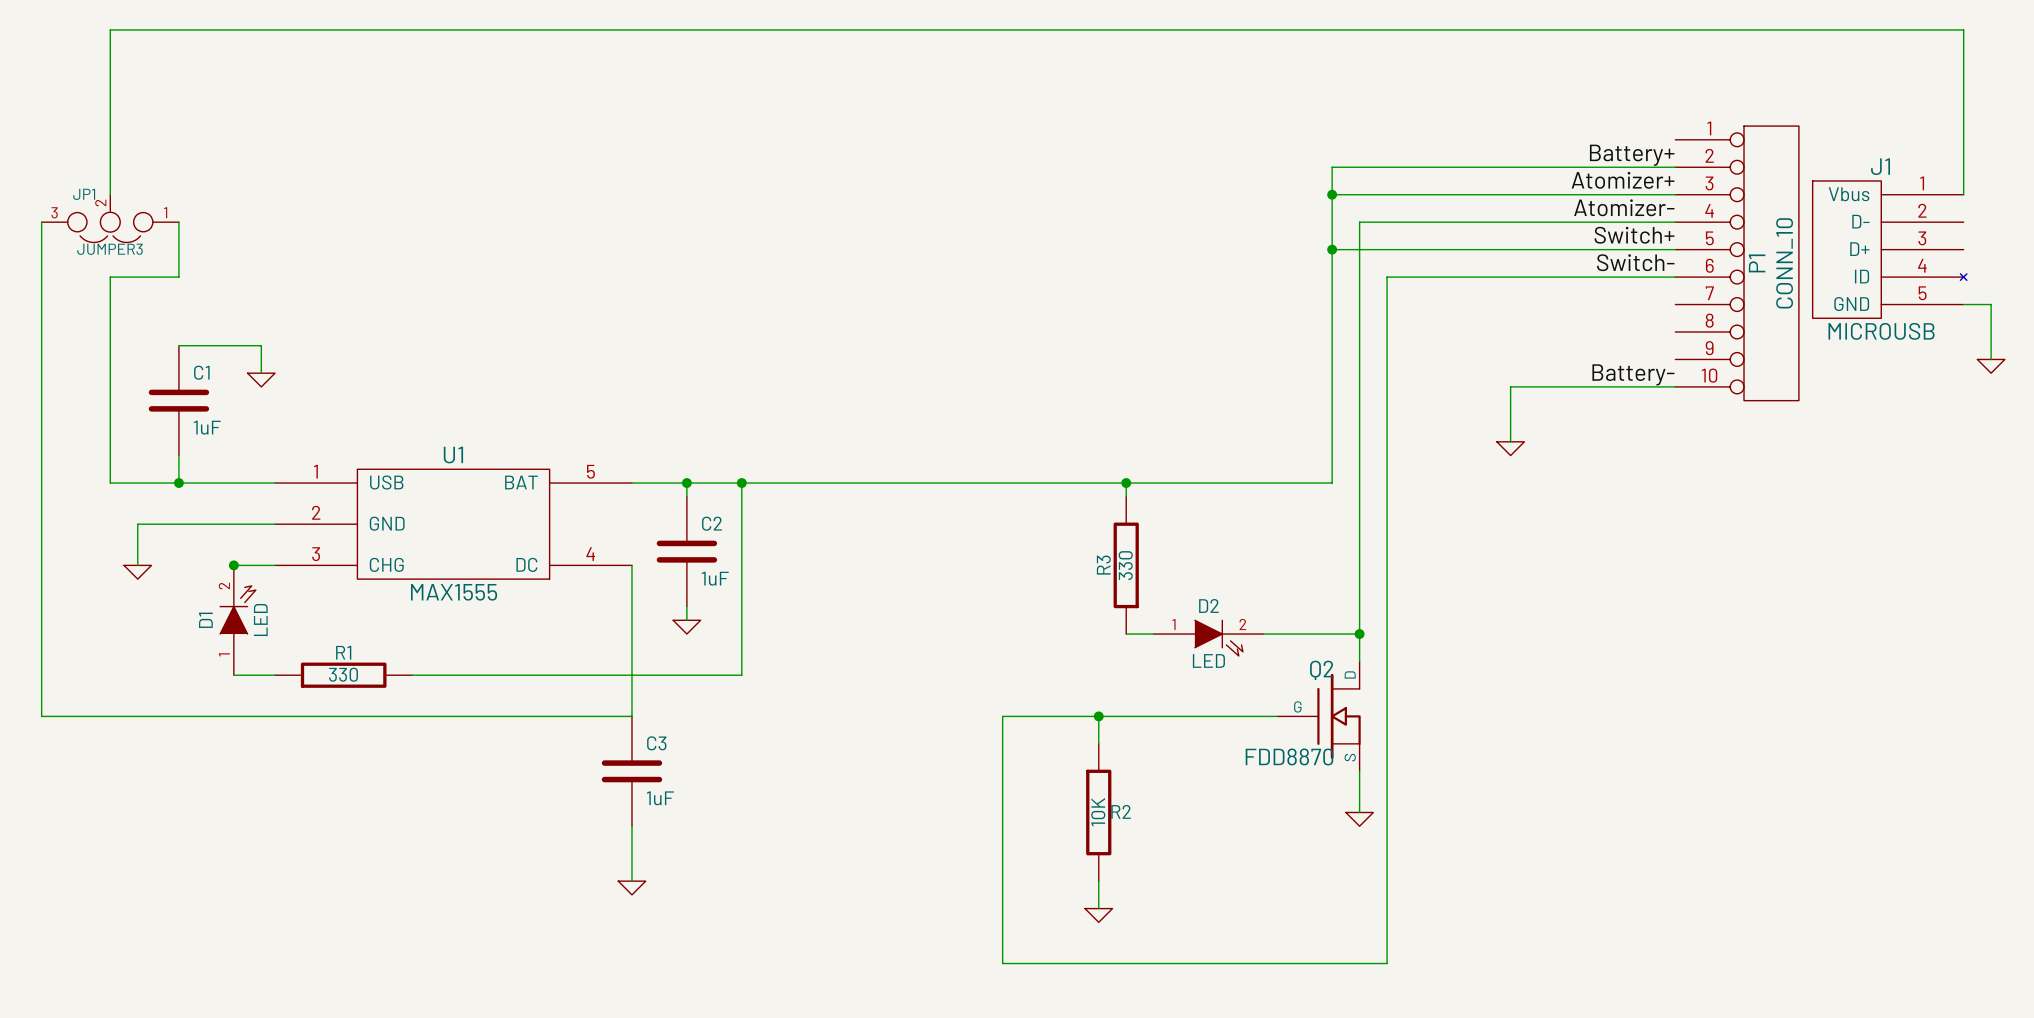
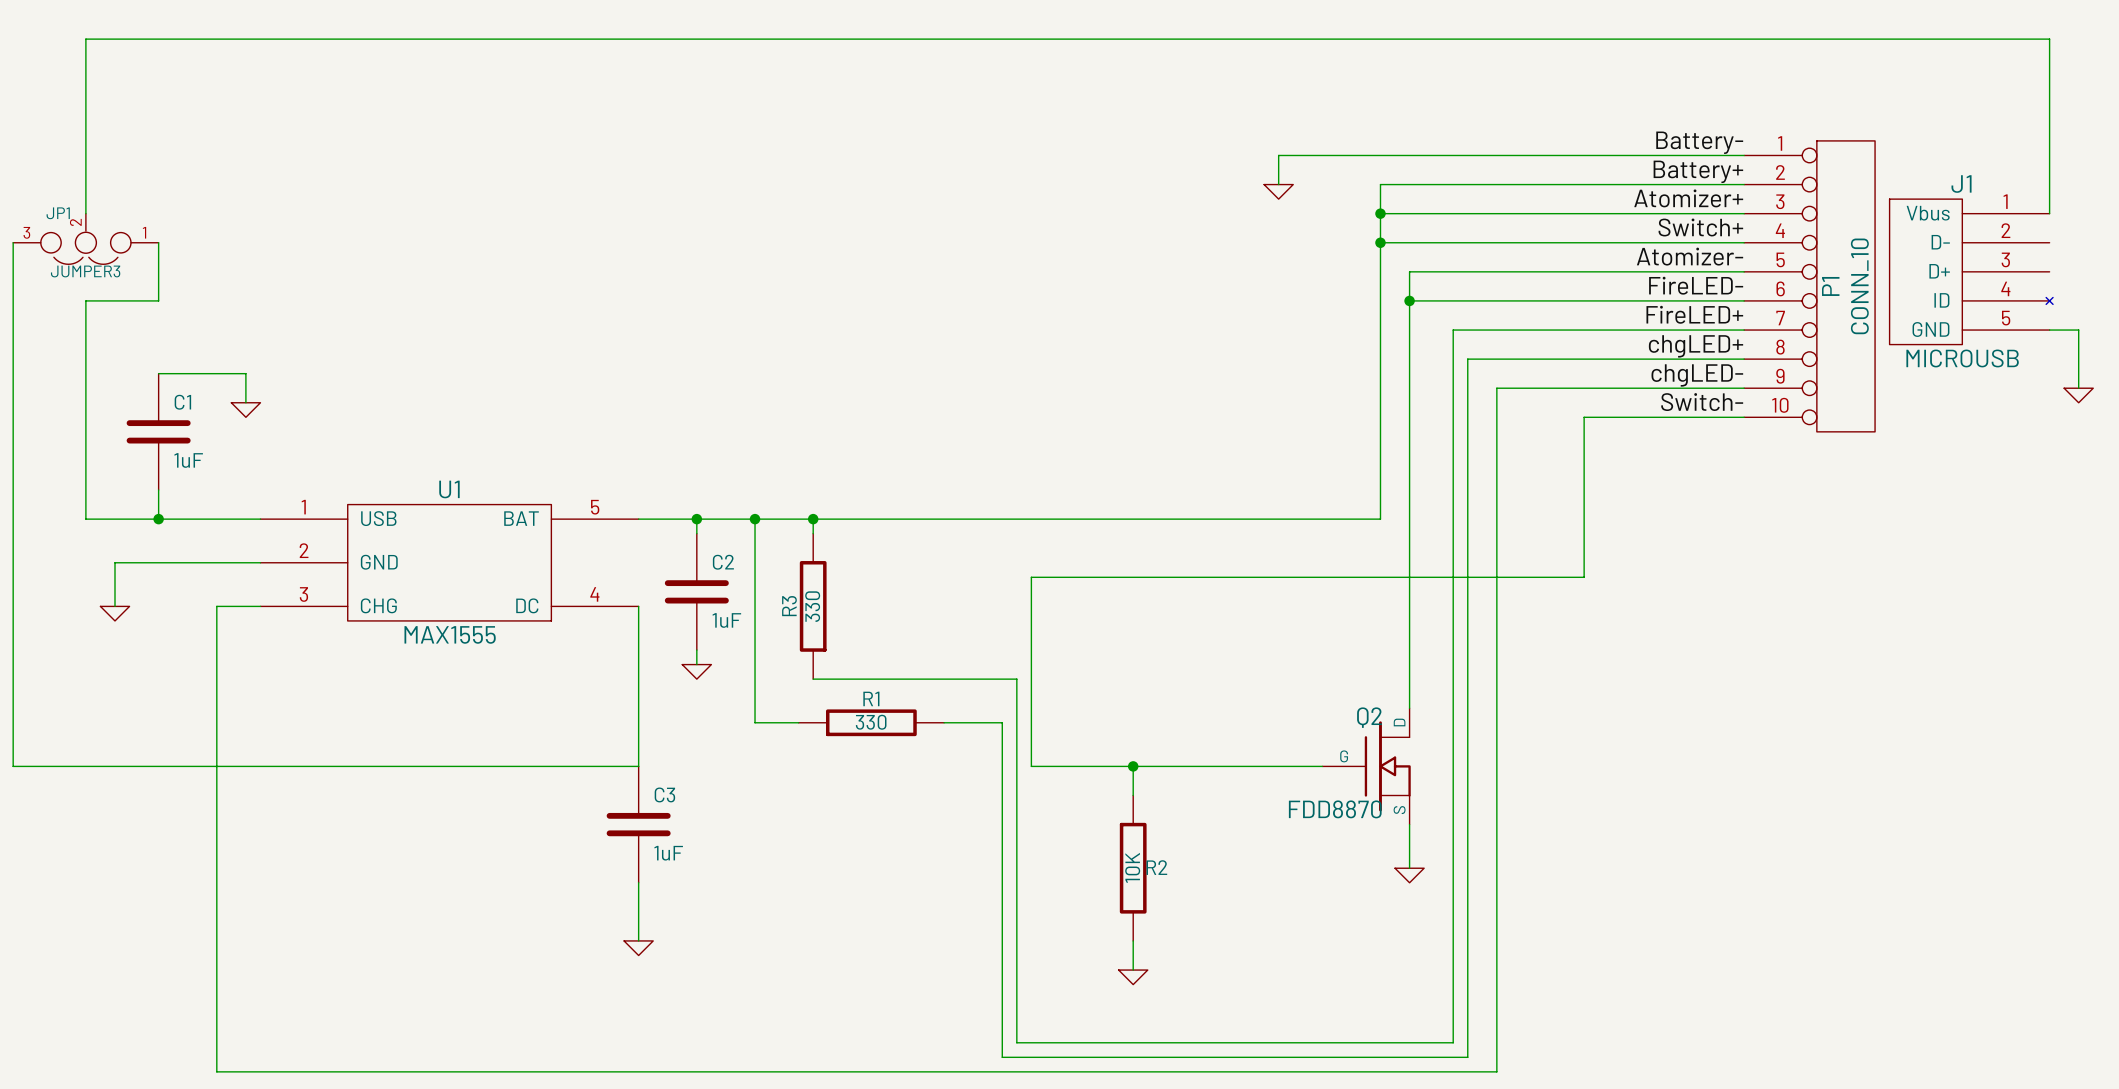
label: none -> Battery- (1699, 142)
wire: none -> (1744, 155) (1278, 155) (1278, 184)
power symbol: none -> (1278, 191)
label: Atomizer- (1624, 207) -> Switch+ (1700, 227)
junction: none -> (1380, 242)
wire: (1359, 222) (1359, 249) (1332, 249) -> (1409, 242) (1380, 242)
label: Switch+ (1634, 235) -> Atomizer- (1690, 256)
junction: (1332, 249) -> none
label: Switch- (1635, 262) -> FireLED- (1696, 285)
wire: none -> (1409, 300) (1438, 300)
junction: none -> (1409, 300)
wire: (1387, 277) (1387, 963) (1002, 963) (1002, 716) -> (1584, 417) (1584, 577) (1031, 577) (1031, 766)
label: none -> FireLED+ (1694, 314)
wire: none -> (1744, 330) (1453, 330) (1453, 1042) (1016, 1042) (1016, 679) (813, 679)
label: none -> chgLED+ (1696, 346)
wire: none -> (1744, 359) (1467, 359) (1467, 1057) (1002, 1057) (1002, 722) (944, 722)
label: none -> chgLED- (1697, 375)
wire: none -> (1744, 388) (1496, 388) (1496, 1071) (216, 1071) (216, 606)
label: Battery- (1633, 374) -> Switch- (1702, 402)
wire: (1524, 386) (1510, 386) (1510, 441) -> none
power symbol: (1510, 448) -> none
wire: none -> (813, 519) (813, 533)
junction: none -> (813, 519)
wire: (1126, 483) (1126, 496) -> none
junction: (1126, 483) -> none
junction: (233, 565) -> none
R3 position: (1126, 565) -> (813, 606)
D1: LED (237, 620) -> none
wire: (1126, 634) (1153, 634) -> none
wire: (1263, 634) (1359, 634) -> none
junction: (1359, 634) -> none
D2: LED (1208, 638) -> none
wire: (233, 675) (275, 675) -> none
R1 position: (343, 675) -> (871, 722)
wire: (412, 675) (741, 675) -> (798, 722) (755, 722)

